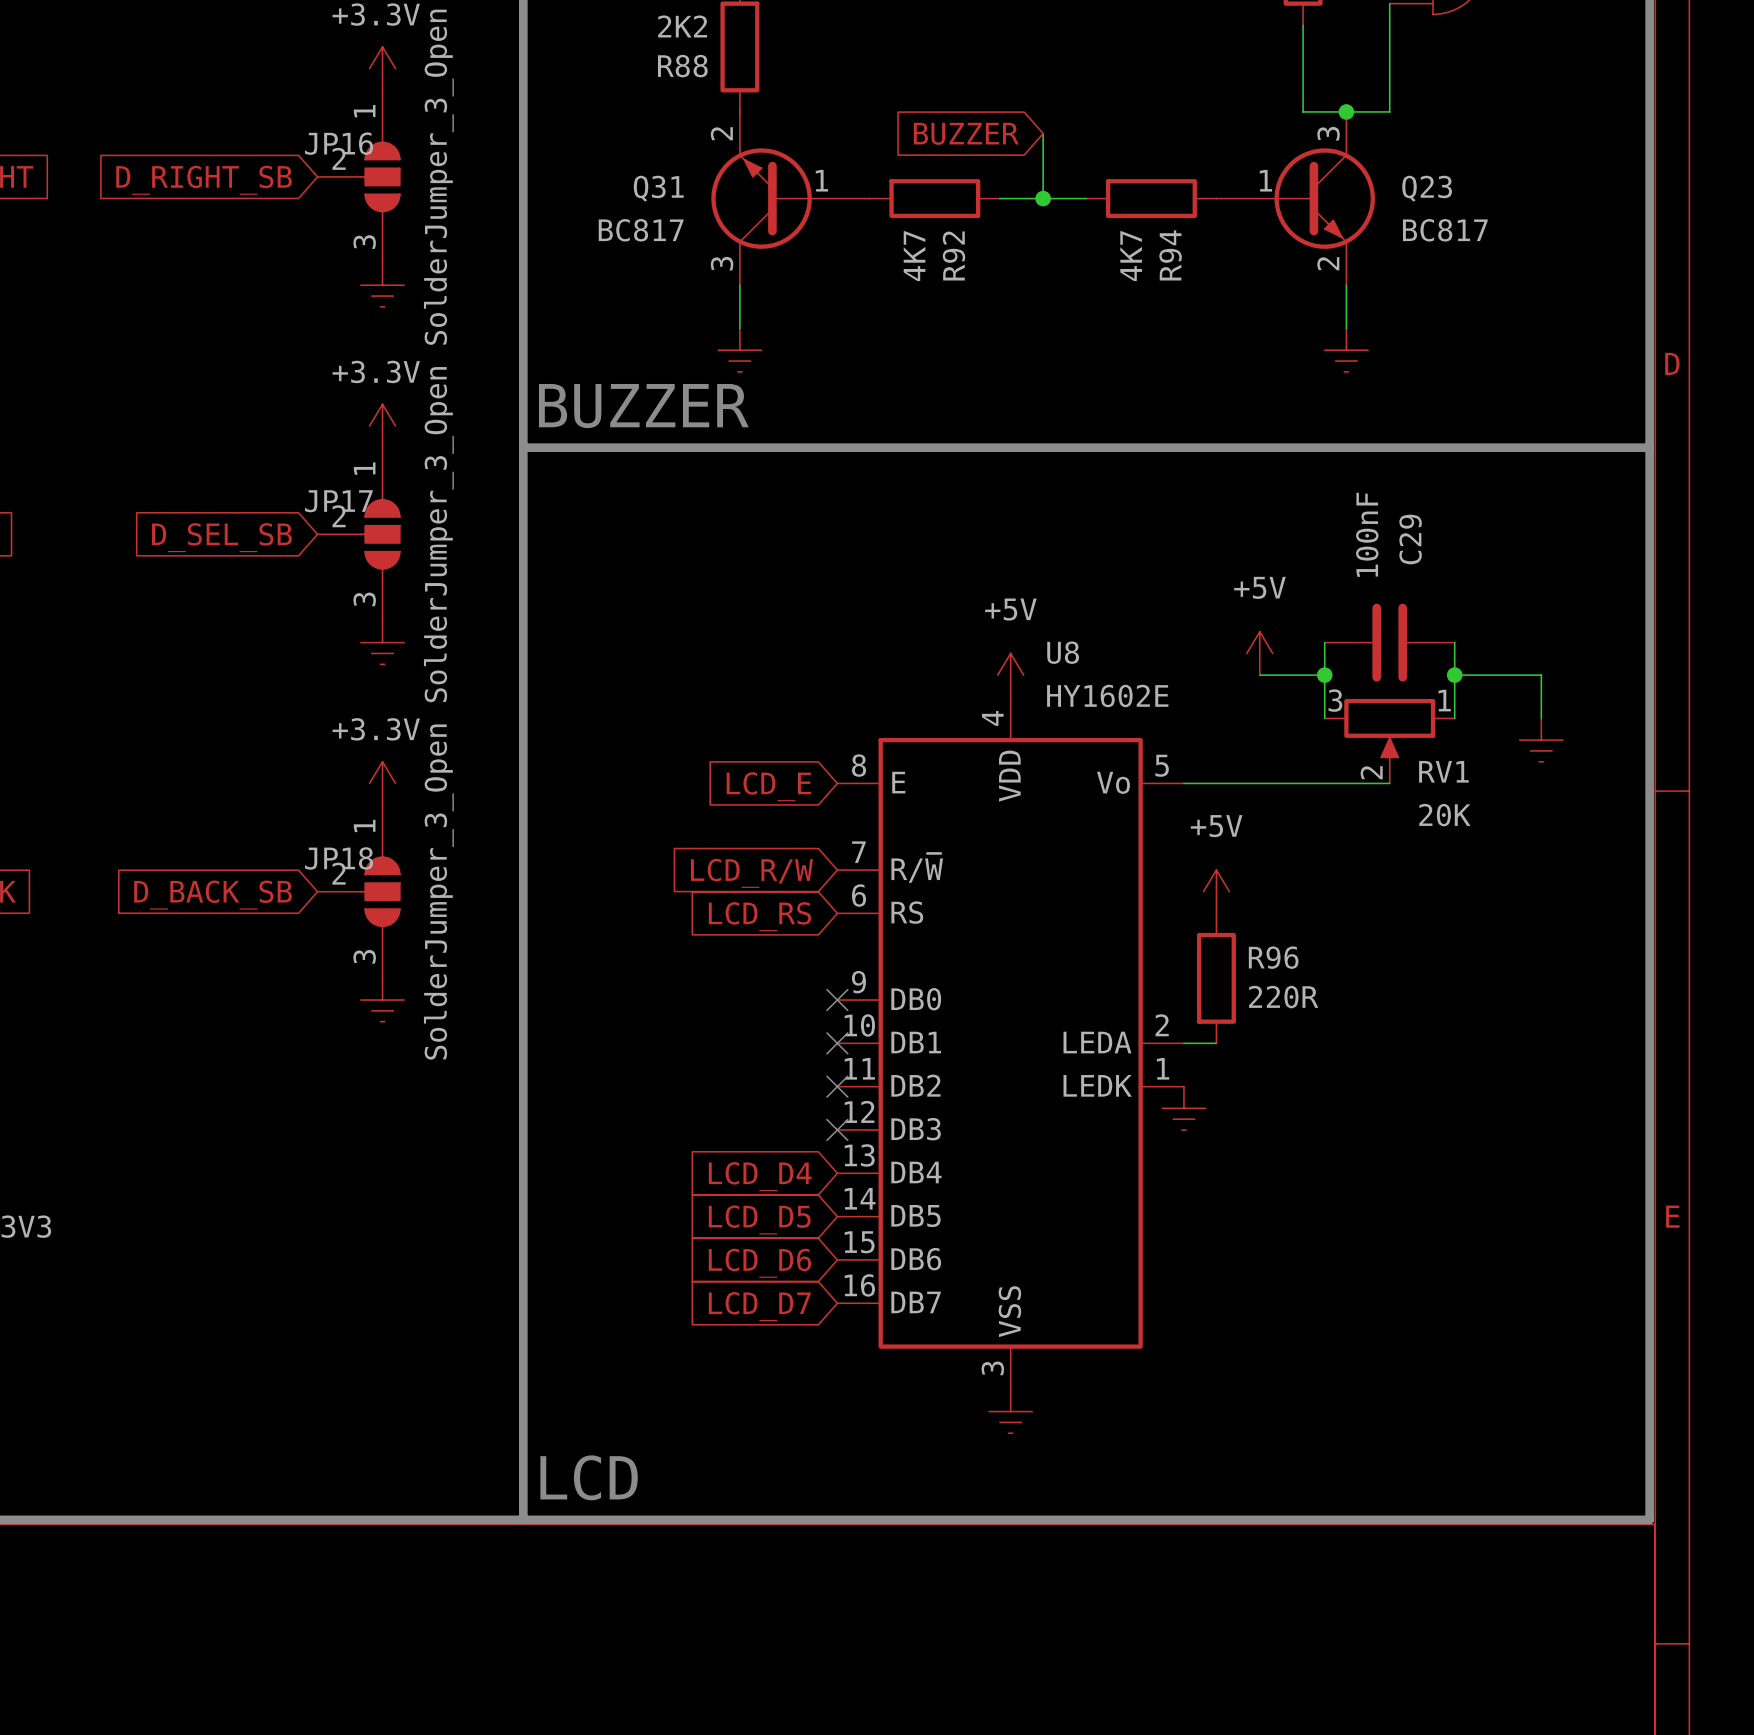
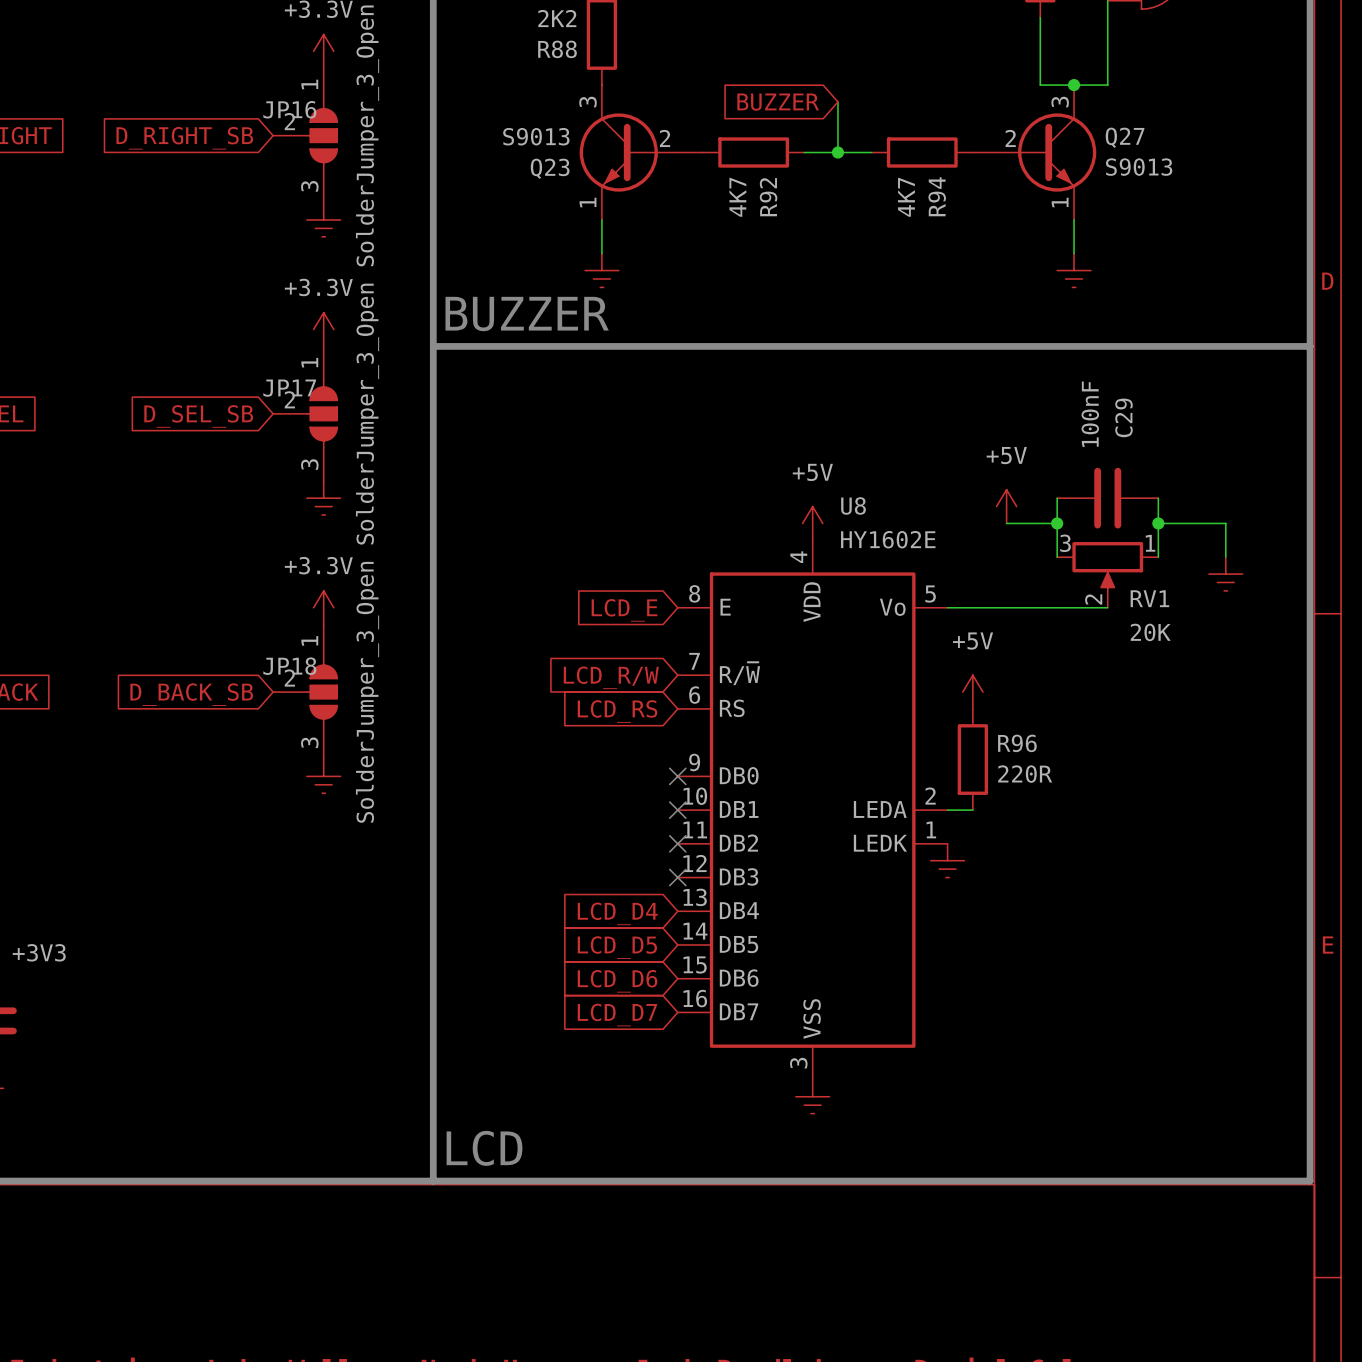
Q23 symbol: [1216, 111, 1375, 286] -> [579, 85, 704, 220]
Q23 name position: Q23 (1427, 188) -> Q23 (550, 168)
Q31: BC817 (790, 198) -> none
Q27: none -> S9013 (1034, 152)
Q23 value: BC817 (1445, 230) -> S9013 (536, 136)

